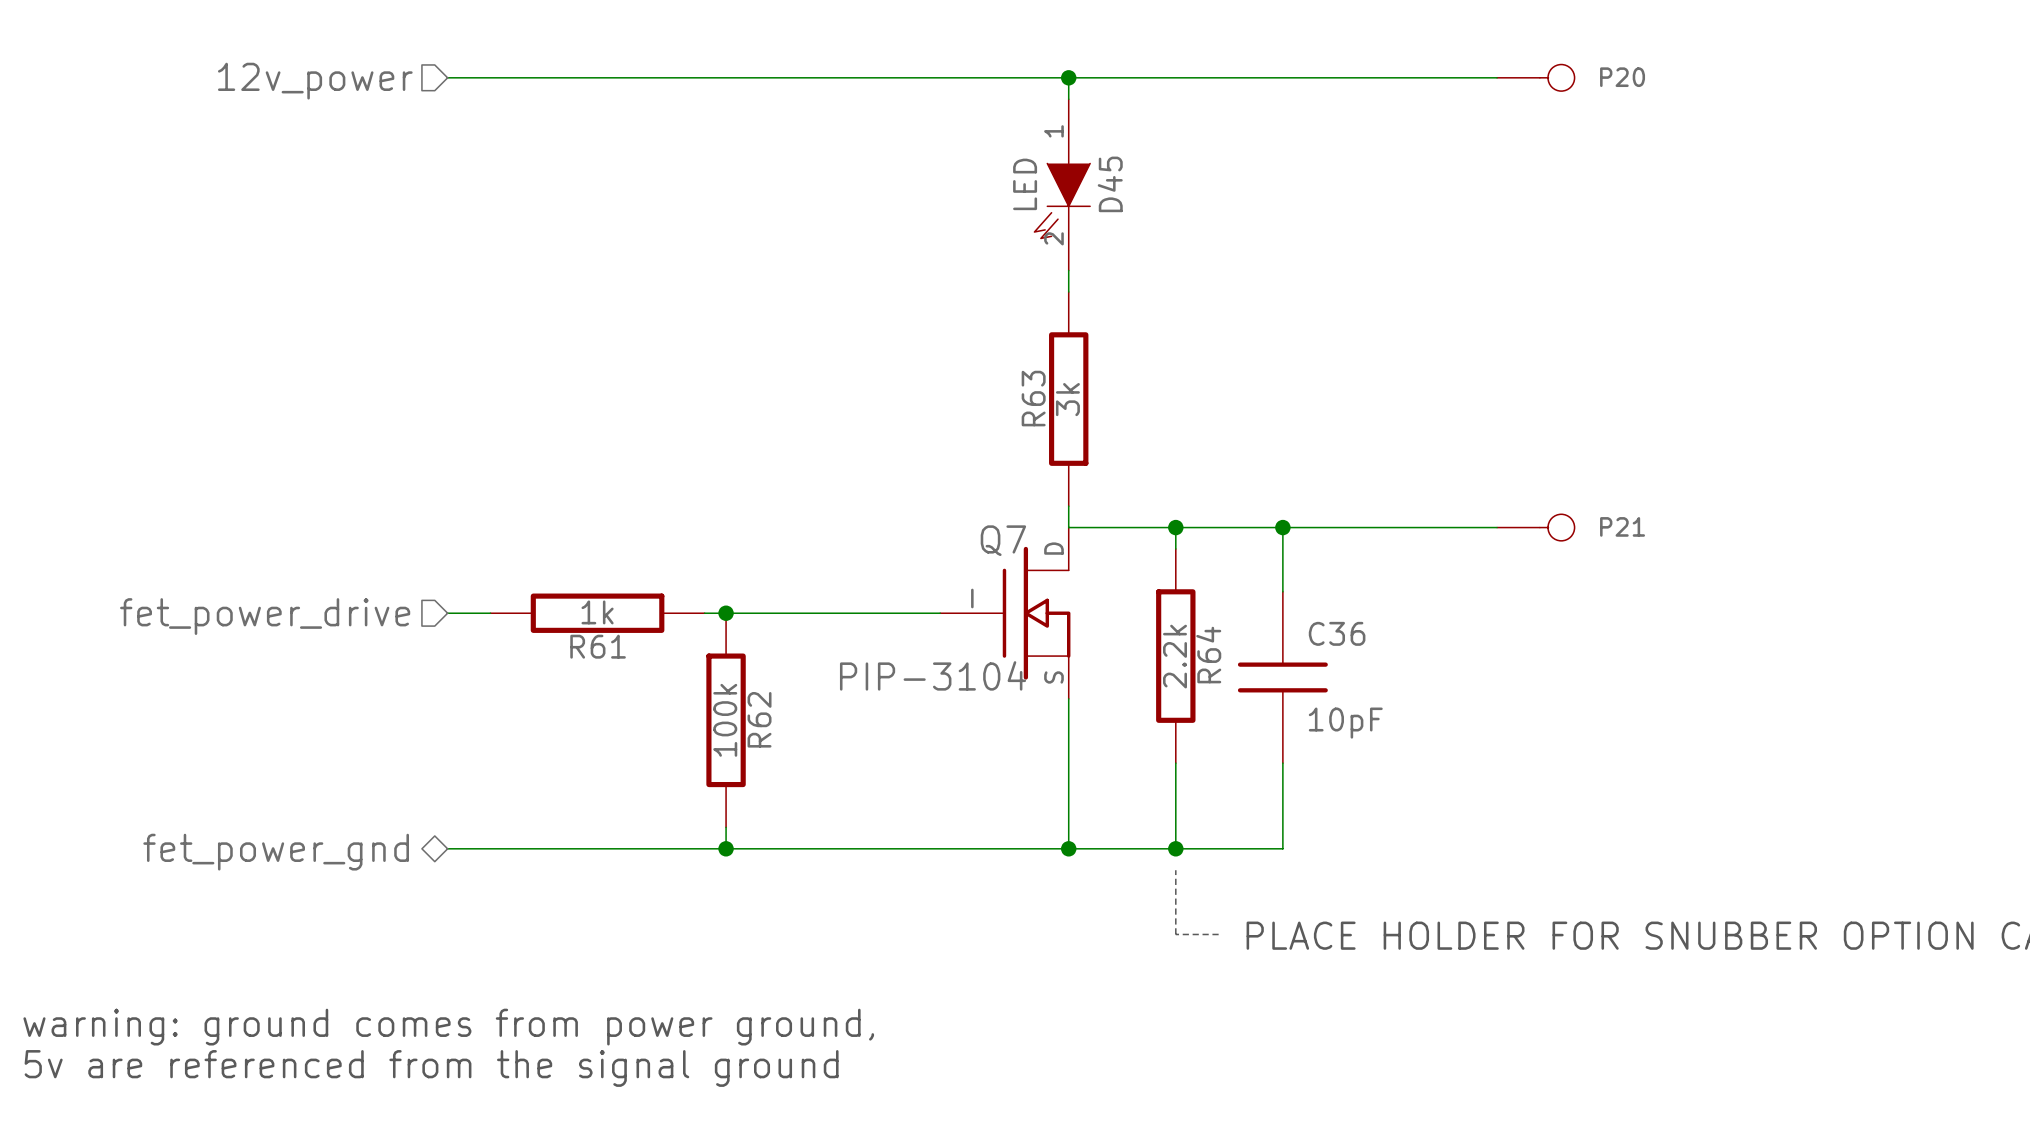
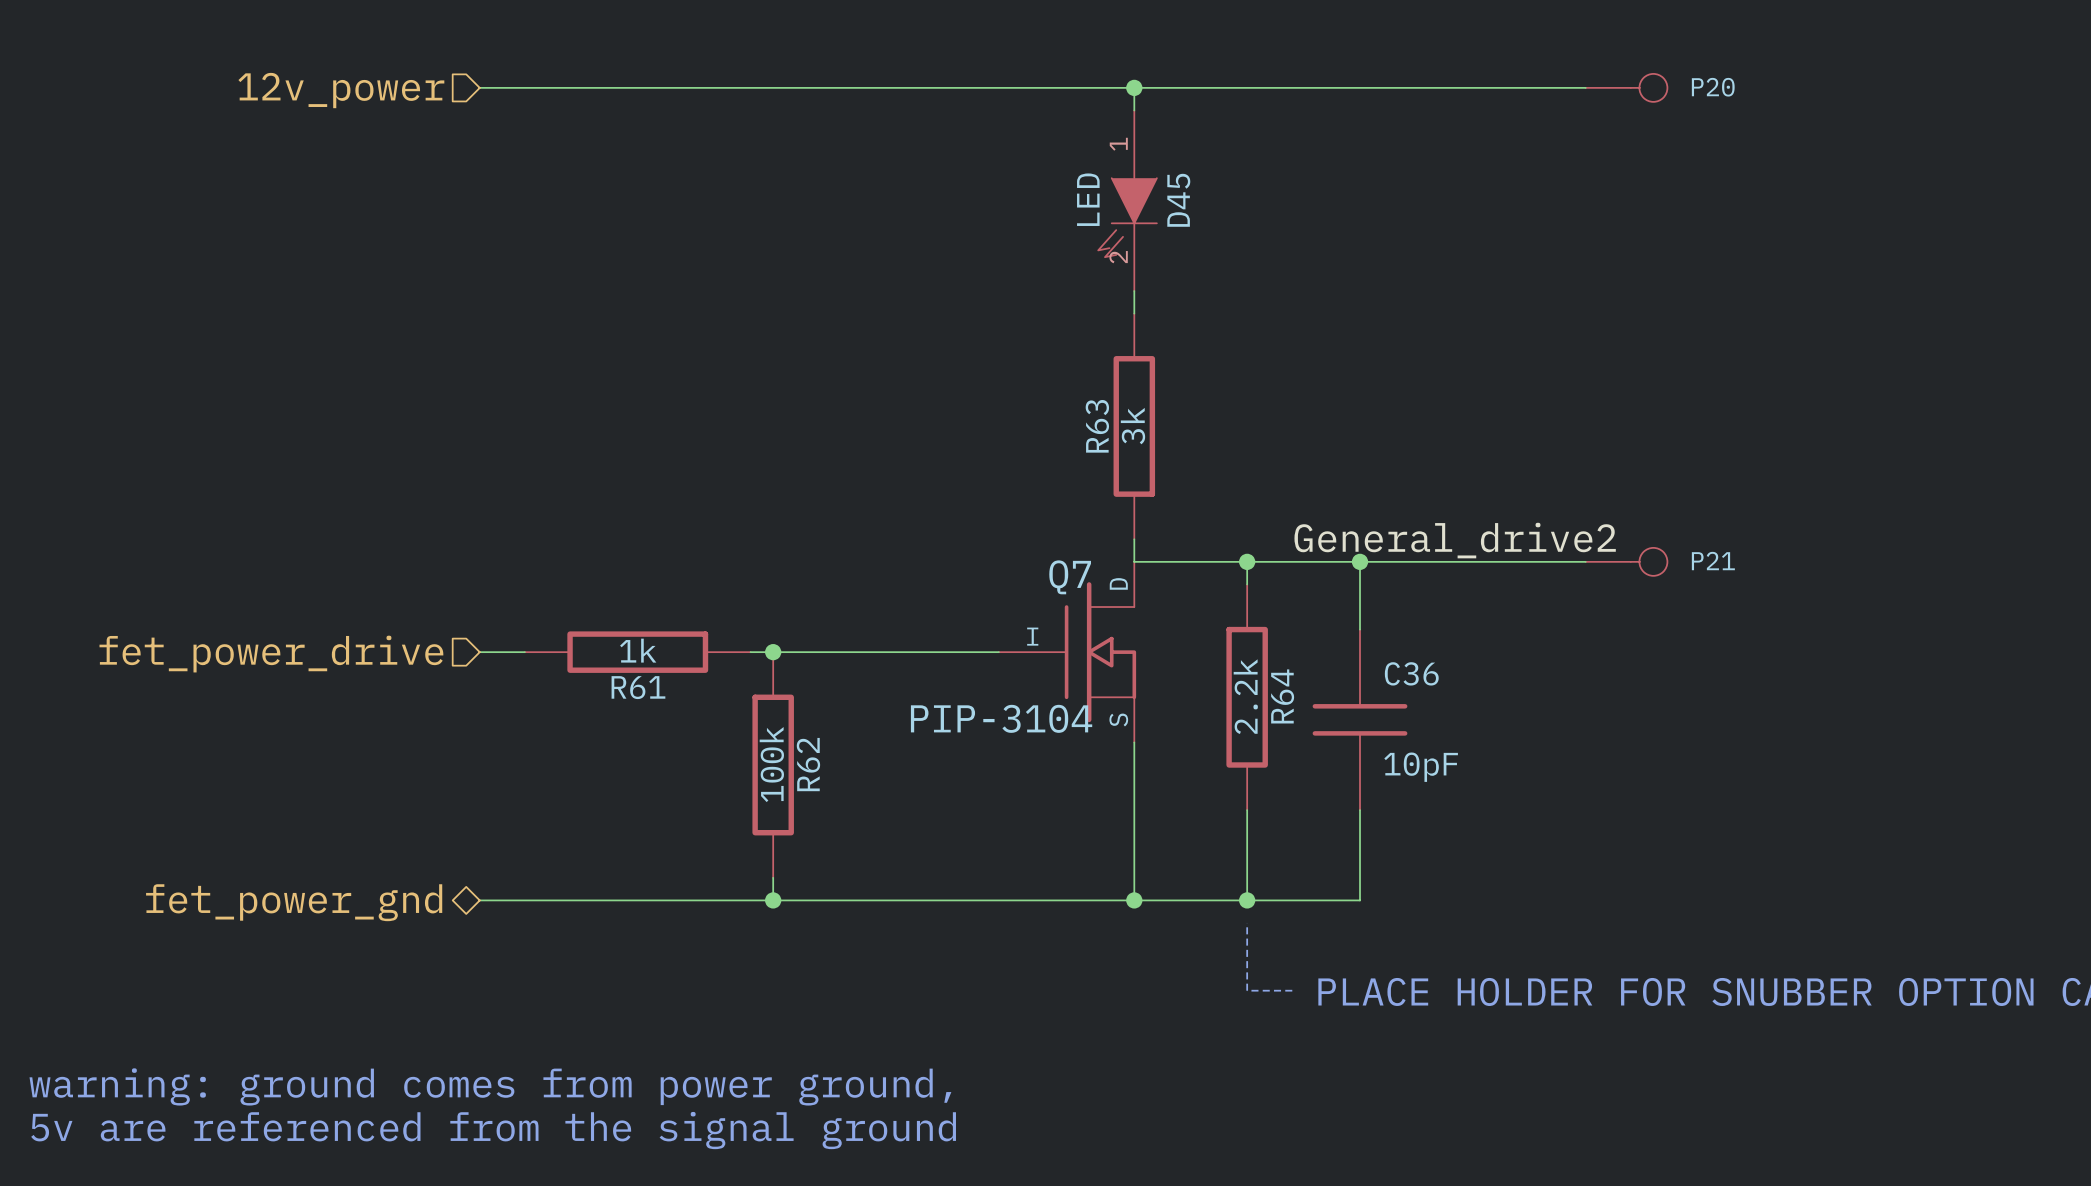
label: none -> General_drive2 (1455, 540)

